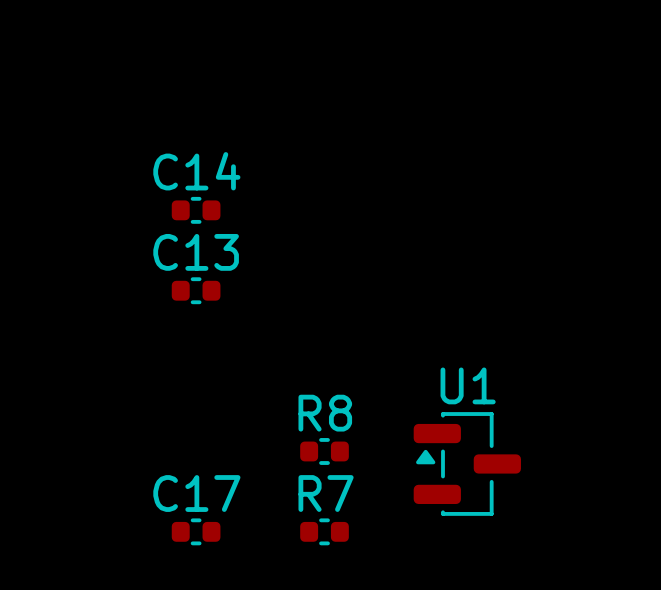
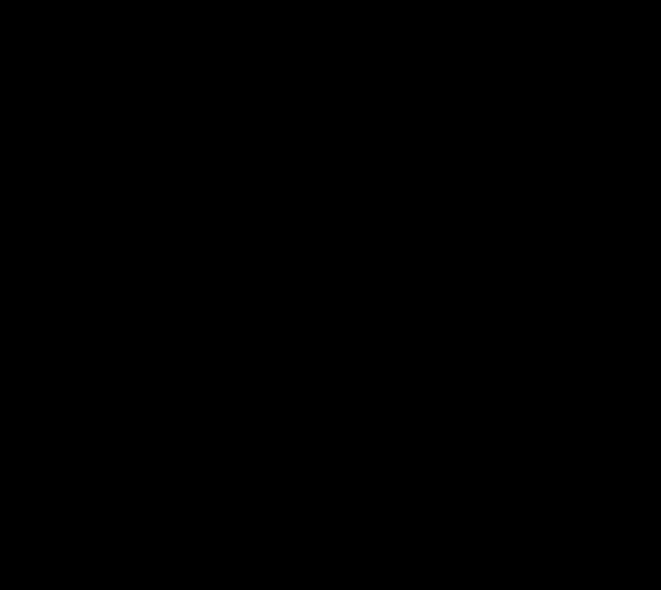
C14: (196, 210) -> none
C13: (196, 290) -> none
R8: (324, 451) -> none
U1: (467, 463) -> none
C17: (196, 531) -> none
R7: (324, 531) -> none

